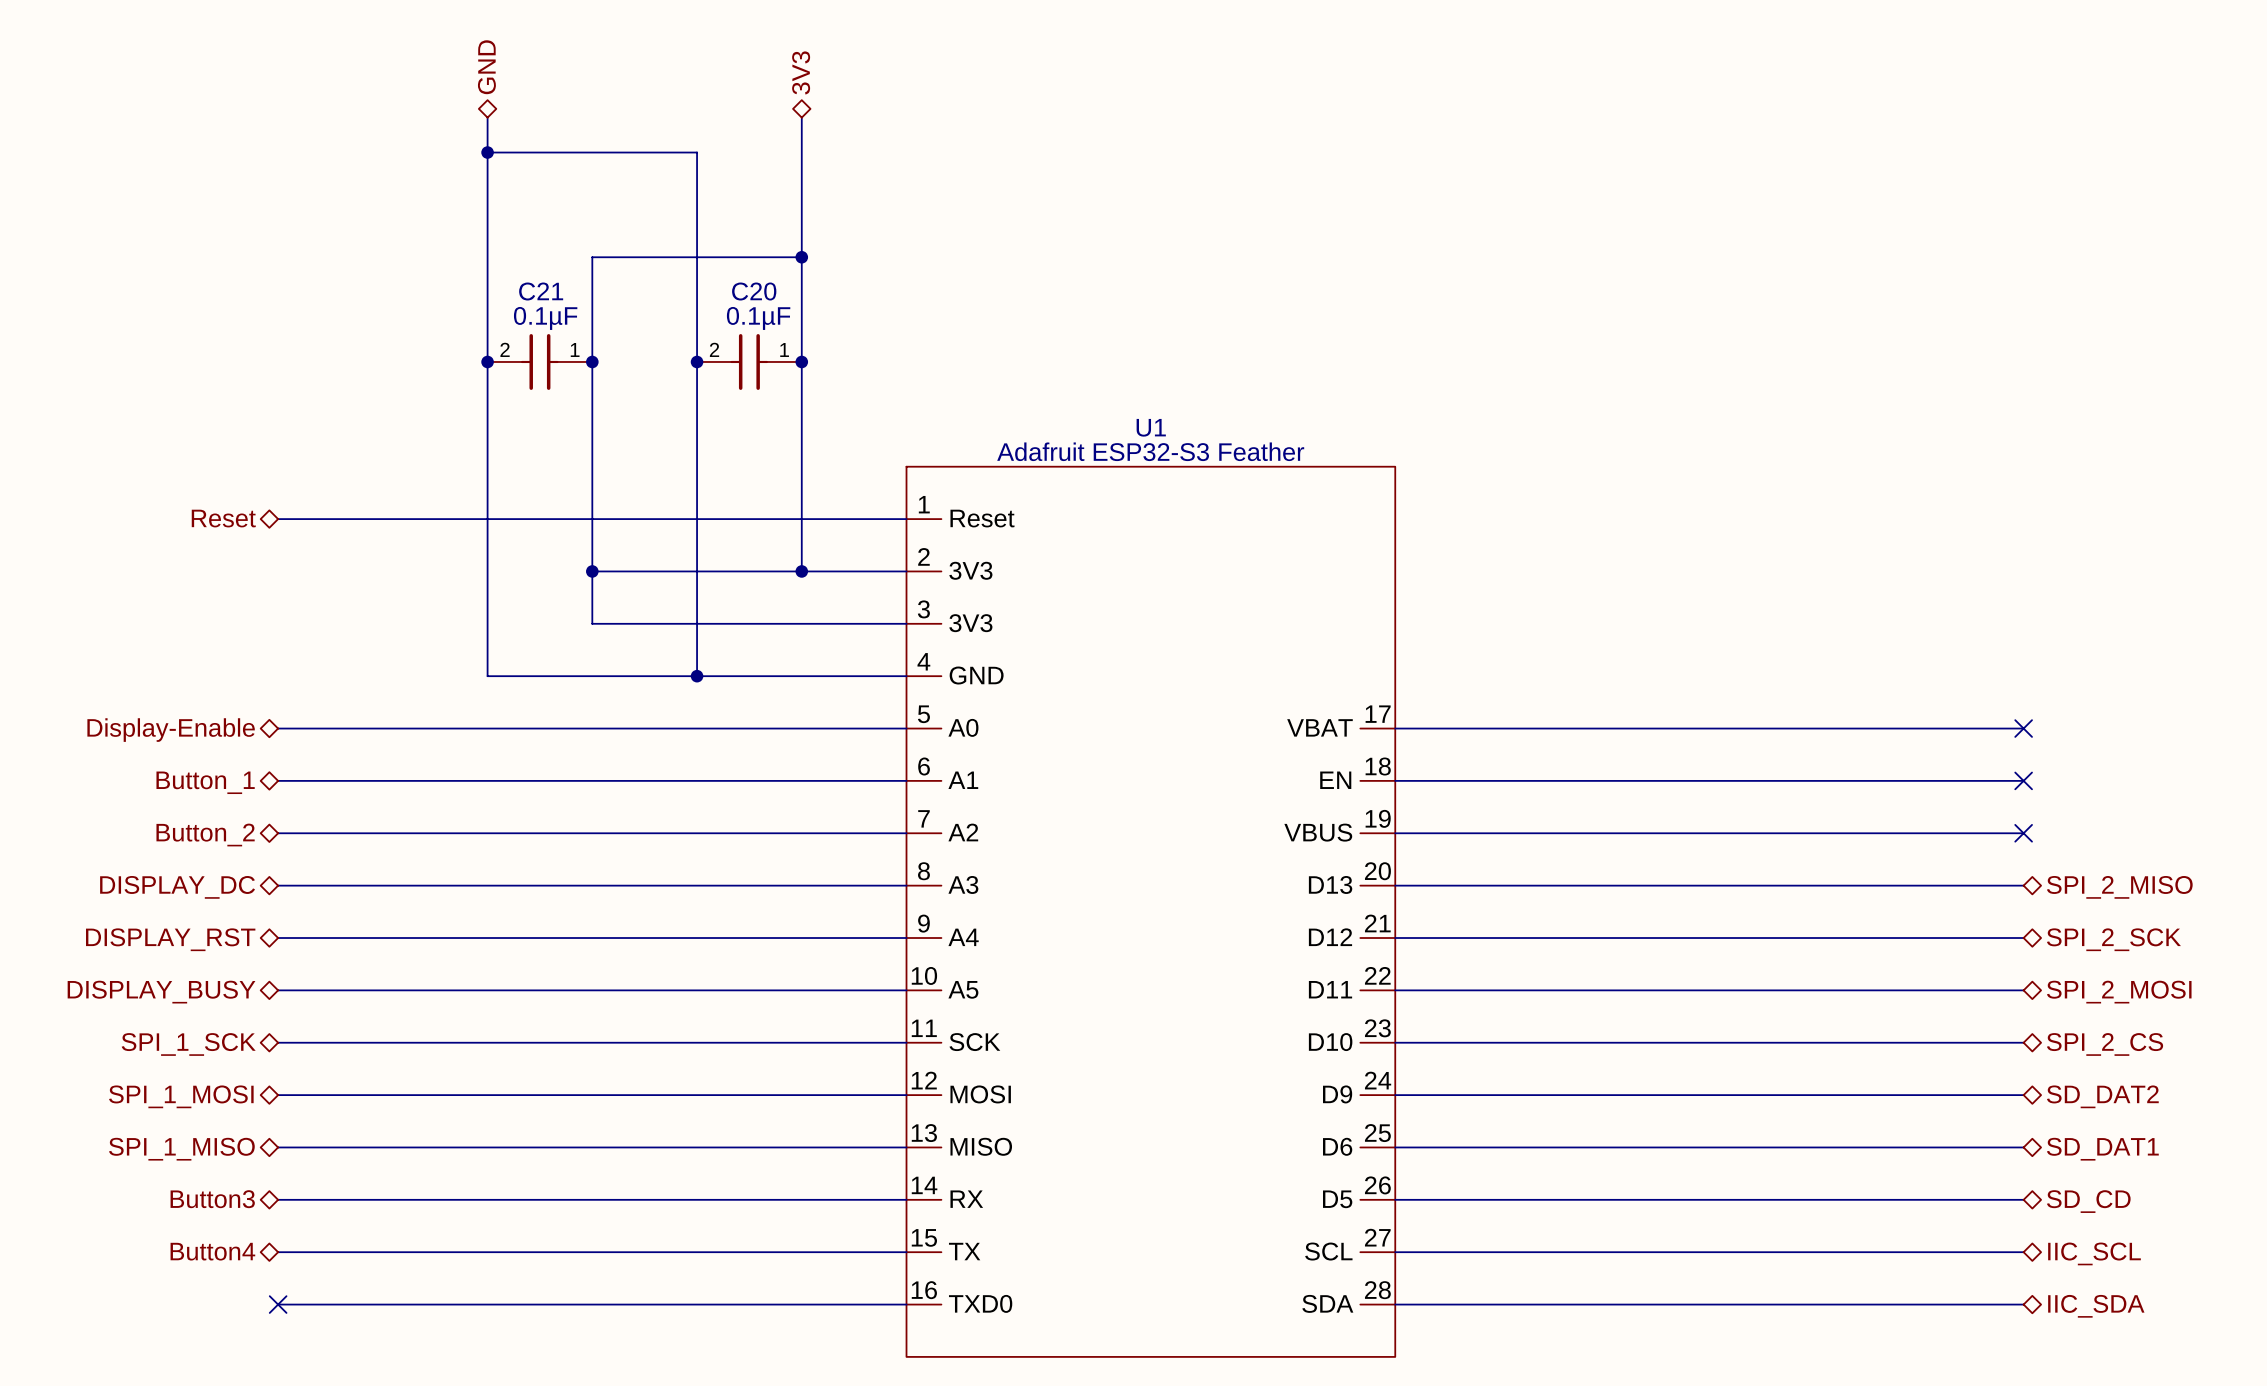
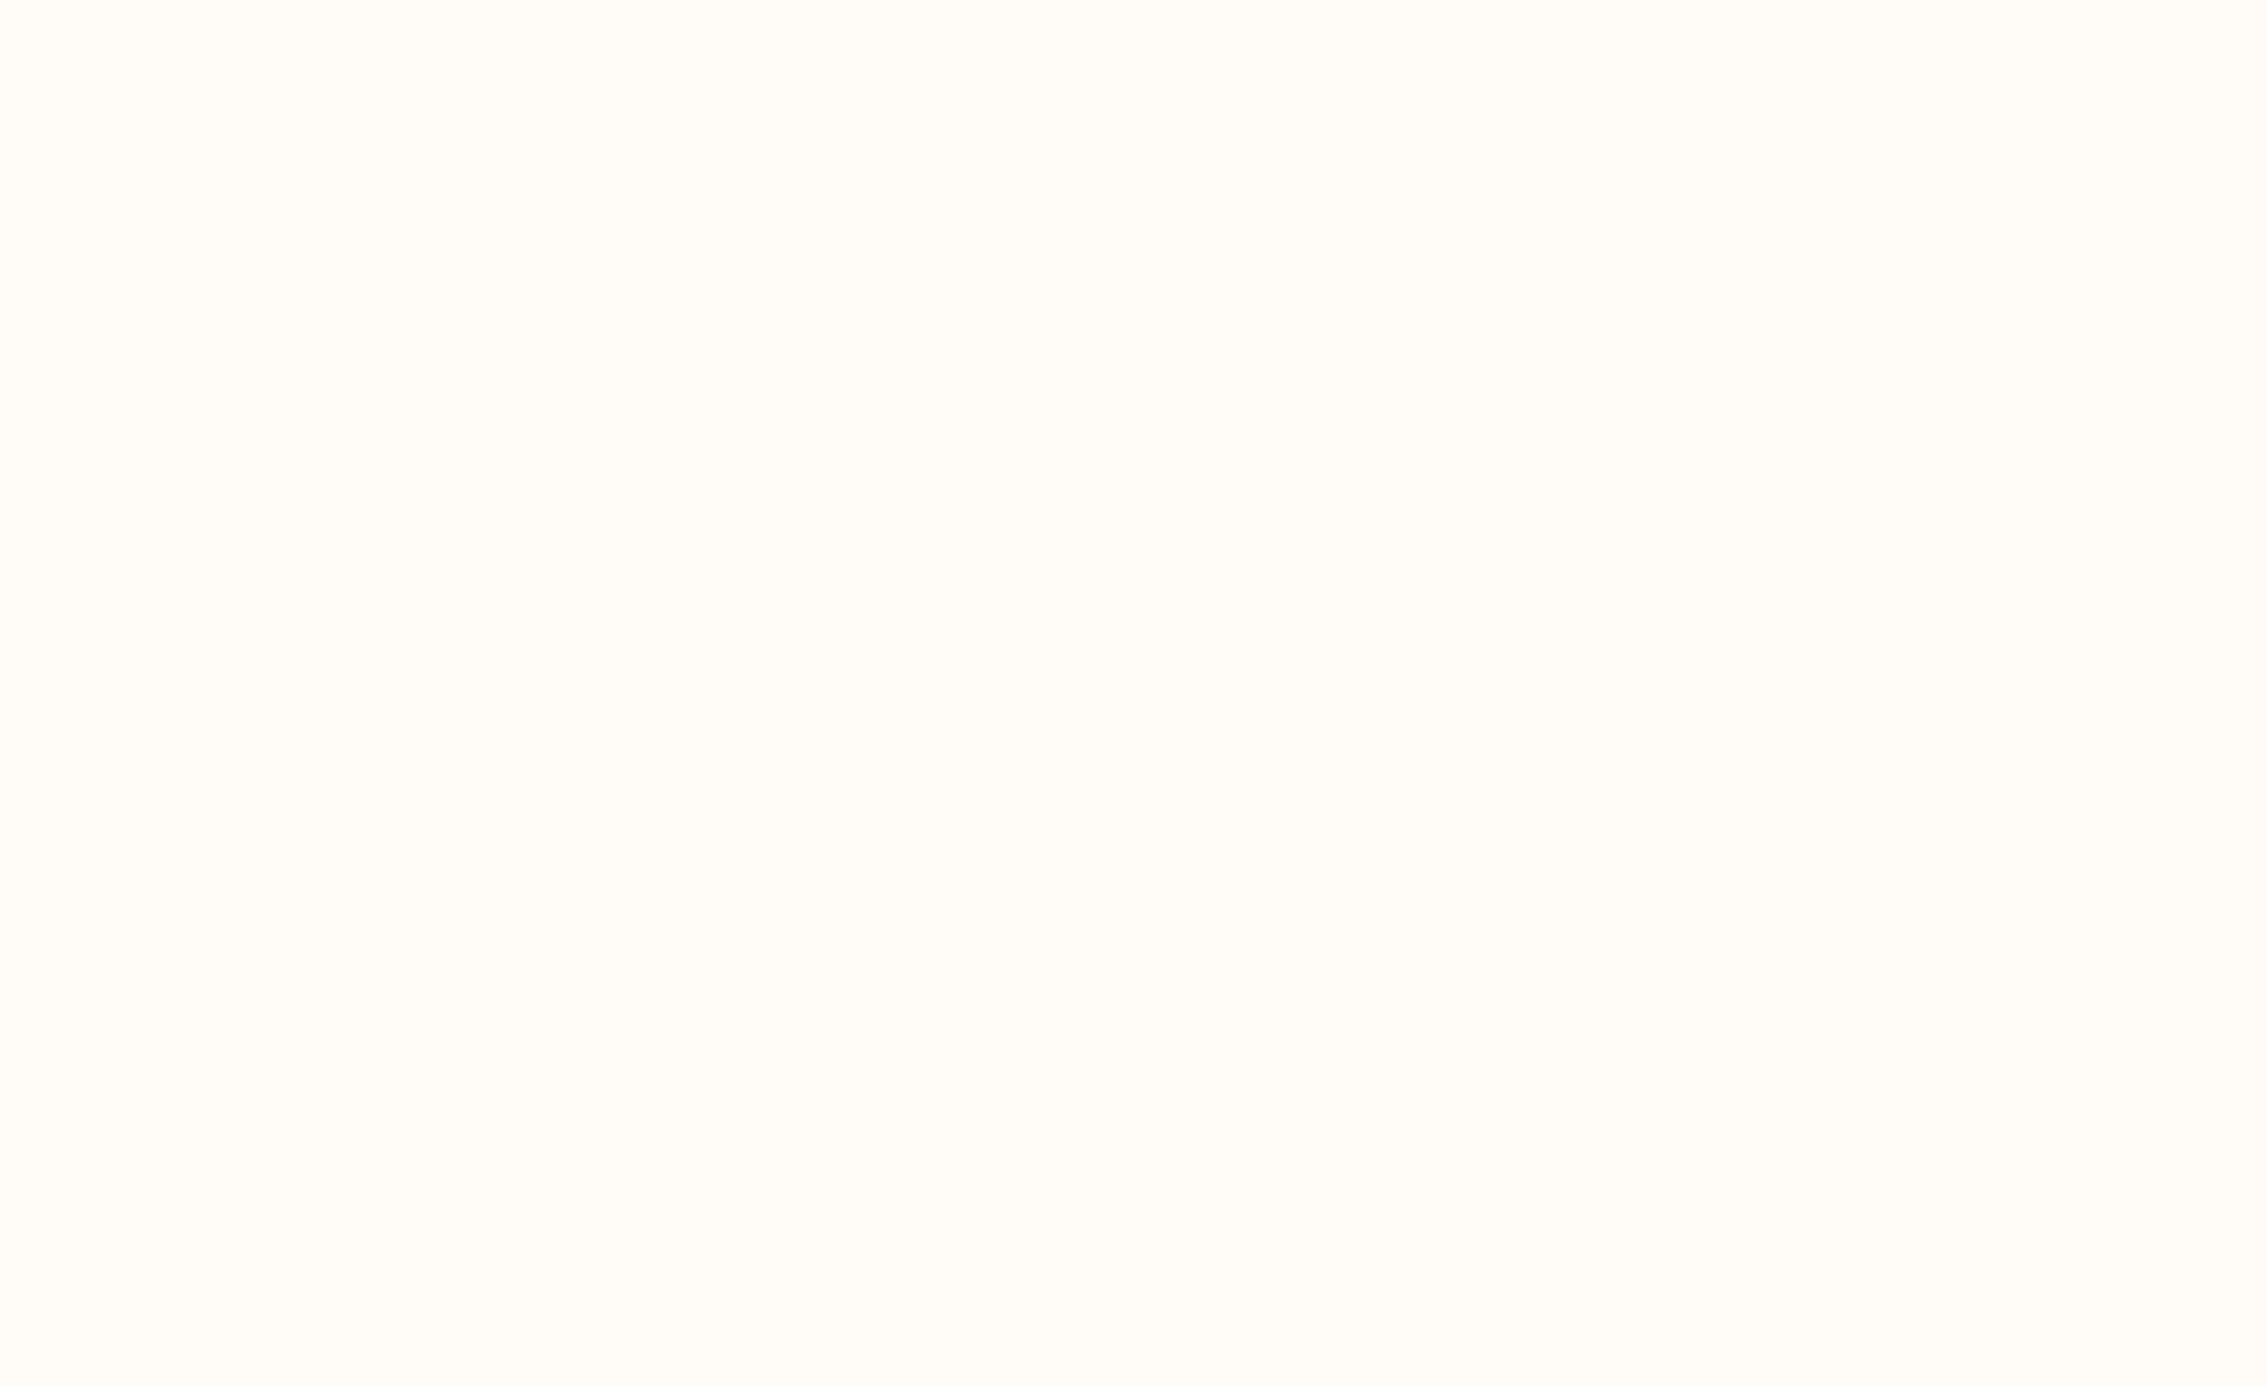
hierarchical label: GND (486, 67) -> none
hierarchical label: 3V3 (801, 72) -> none
wire: (487, 117) (487, 676) (906, 676) -> none
wire: (801, 117) (801, 571) -> none
wire: (487, 152) (697, 152) (697, 676) -> none
junction: (487, 152) -> none
wire: (801, 257) (592, 257) (592, 623) (906, 623) -> none
junction: (801, 257) -> none
junction: (487, 361) -> none
C21: 0.1µF (539, 361) -> none
junction: (592, 361) -> none
junction: (697, 361) -> none
C20: 0.1µF (749, 361) -> none
junction: (801, 361) -> none
hierarchical label: Reset (223, 518) -> none
wire: (278, 519) (906, 519) -> none
wire: (592, 571) (906, 571) -> none
junction: (592, 571) -> none
junction: (801, 571) -> none
junction: (697, 676) -> none
wire: (278, 728) (906, 728) -> none
wire: (1395, 728) (2023, 728) -> none
no-connect mark: (2023, 728) -> none
hierarchical label: Display-Enable (171, 730) -> none
wire: (278, 780) (906, 780) -> none
wire: (1395, 780) (2023, 780) -> none
no-connect mark: (2023, 780) -> none
hierarchical label: Button_1 (205, 782) -> none
wire: (278, 833) (906, 833) -> none
wire: (1395, 833) (2023, 833) -> none
no-connect mark: (2023, 833) -> none
hierarchical label: Button_2 (205, 835) -> none
wire: (278, 885) (906, 885) -> none
wire: (1395, 885) (2023, 885) -> none
hierarchical label: DISPLAY_DC (177, 887) -> none
hierarchical label: SPI_2_MISO (2119, 887) -> none
U1: Adafruit ESP32-S3 Feather (1150, 911) -> none
wire: (278, 938) (906, 938) -> none
wire: (1395, 938) (2023, 938) -> none
hierarchical label: DISPLAY_RST (170, 939) -> none
hierarchical label: SPI_2_SCK (2113, 939) -> none
wire: (278, 990) (906, 990) -> none
wire: (1395, 990) (2023, 990) -> none
hierarchical label: DISPLAY_BUSY (161, 992) -> none
hierarchical label: SPI_2_MOSI (2119, 992) -> none
wire: (278, 1042) (906, 1042) -> none
wire: (1395, 1042) (2023, 1042) -> none
hierarchical label: SPI_1_SCK (188, 1044) -> none
hierarchical label: SPI_2_CS (2105, 1044) -> none
wire: (278, 1095) (906, 1095) -> none
wire: (1395, 1095) (2023, 1095) -> none
hierarchical label: SPI_1_MOSI (181, 1096) -> none
hierarchical label: SD_DAT2 (2102, 1096) -> none
wire: (278, 1147) (906, 1147) -> none
wire: (1395, 1147) (2023, 1147) -> none
hierarchical label: SPI_1_MISO (181, 1149) -> none
hierarchical label: SD_DAT1 (2102, 1149) -> none
hierarchical label: Button3 (212, 1199) -> none
wire: (278, 1199) (906, 1199) -> none
wire: (1395, 1199) (2023, 1199) -> none
hierarchical label: SD_CD (2088, 1201) -> none
hierarchical label: Button4 (212, 1251) -> none
wire: (278, 1252) (906, 1252) -> none
wire: (1395, 1252) (2023, 1252) -> none
hierarchical label: IIC_SCL (2094, 1253) -> none
wire: (278, 1304) (906, 1304) -> none
no-connect mark: (278, 1304) -> none
wire: (1395, 1304) (2023, 1304) -> none
hierarchical label: IIC_SDA (2096, 1306) -> none

